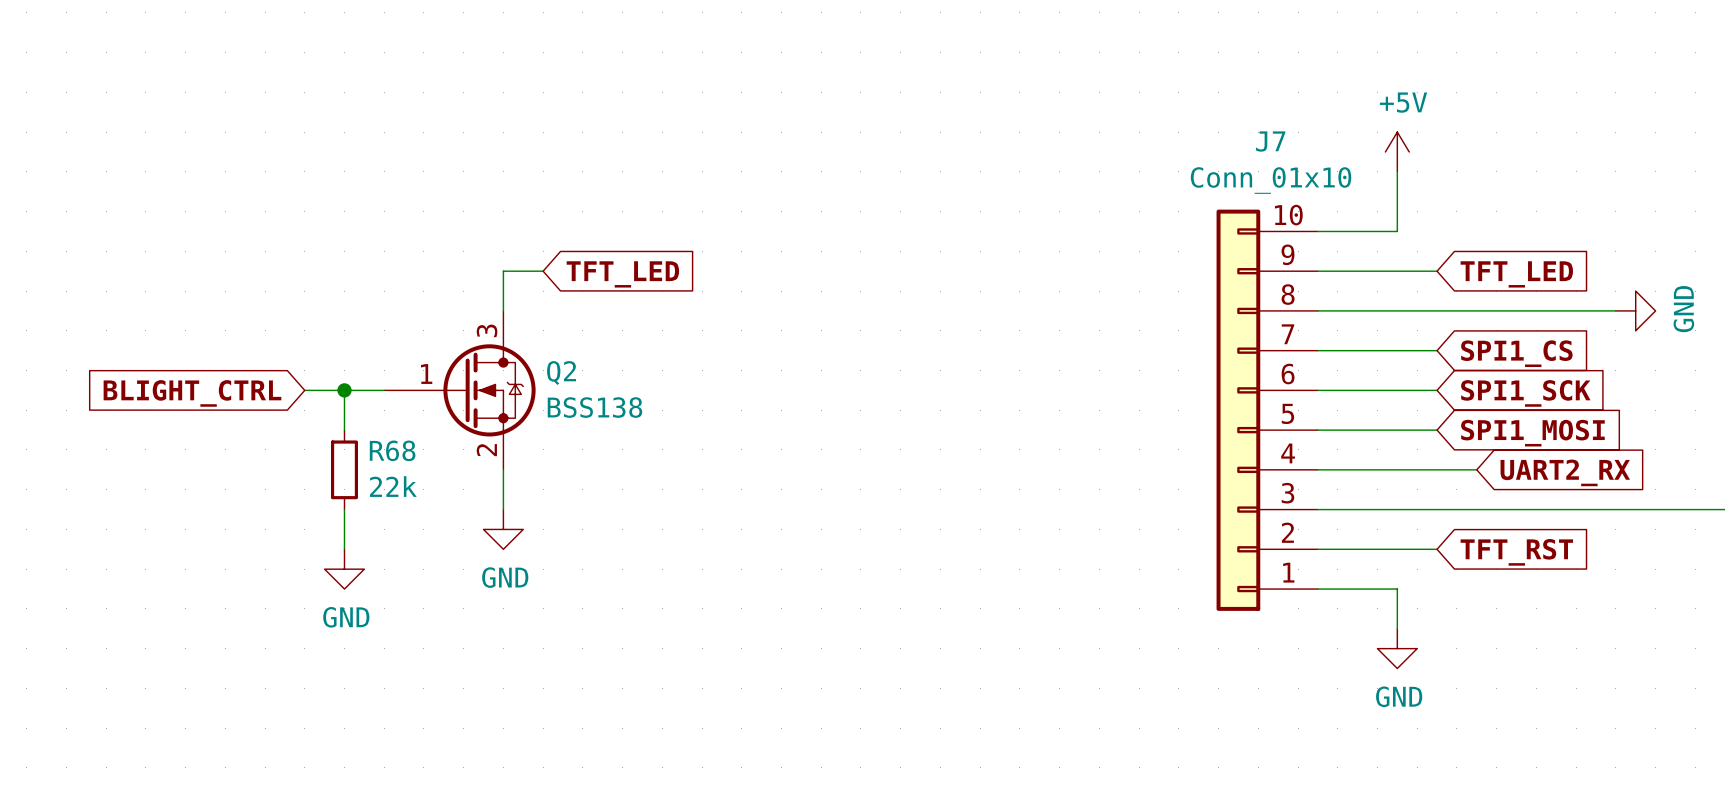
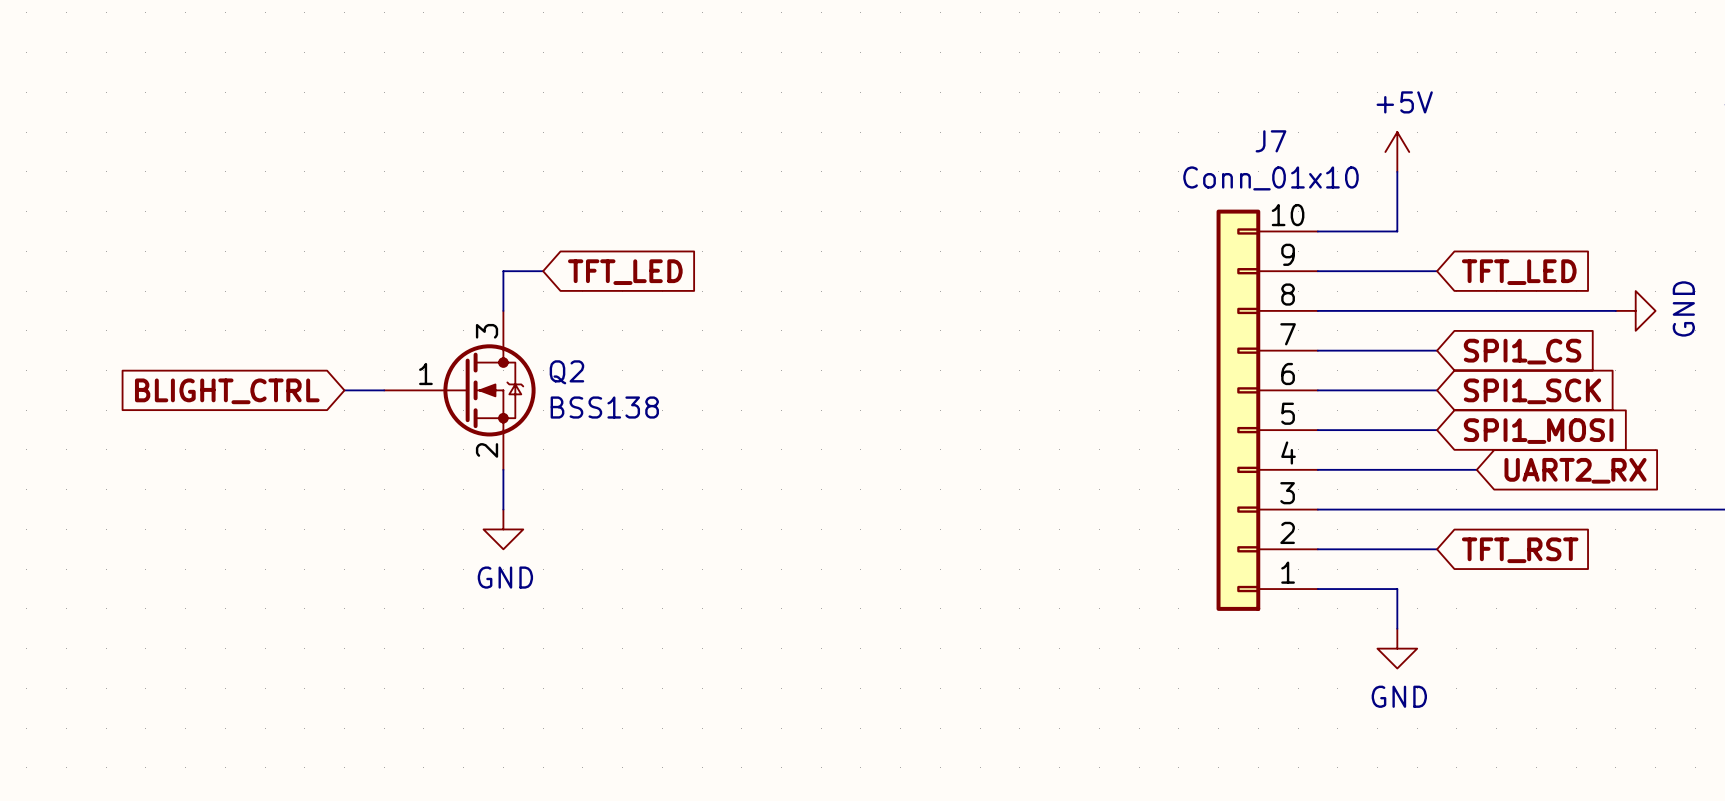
wire: (304, 390) (344, 390) (344, 430) -> none
junction: (344, 390) -> none
global label position: BLIGHT_CTRL (192, 393) -> BLIGHT_CTRL (227, 391)
R68: 22k (344, 469) -> none
wire: (344, 509) (344, 549) -> none
power symbol: GND (344, 569) -> none

